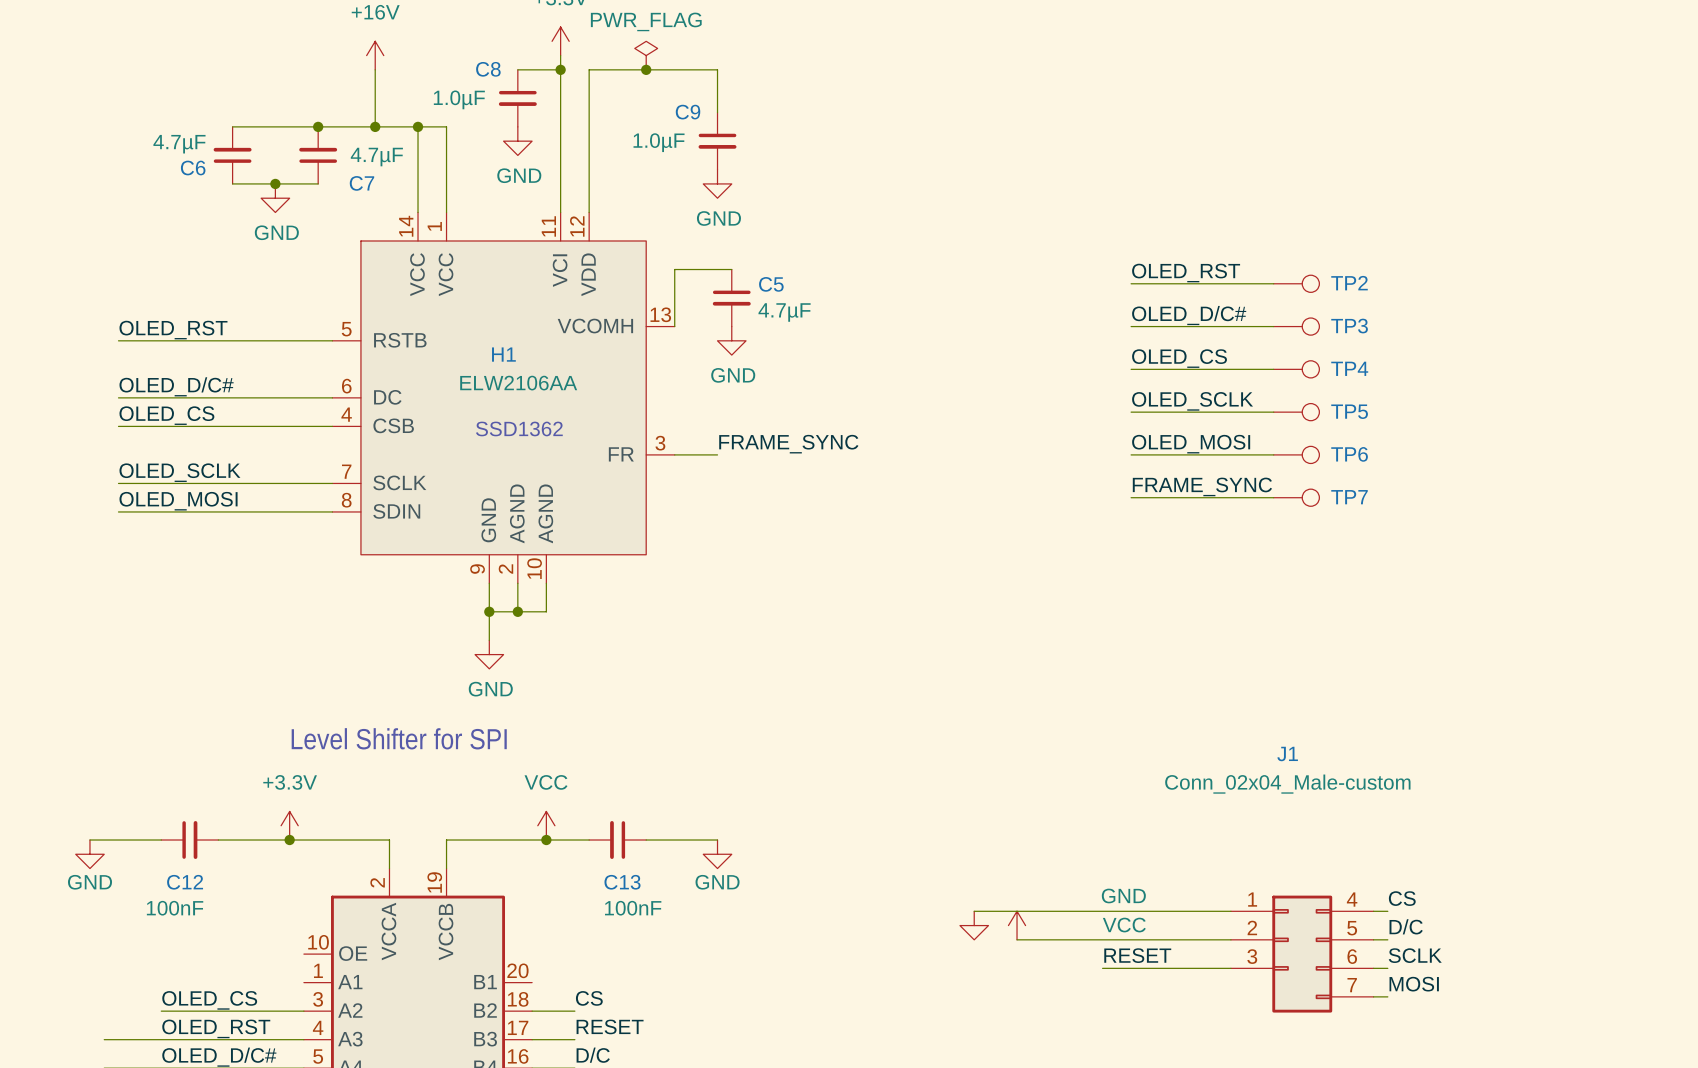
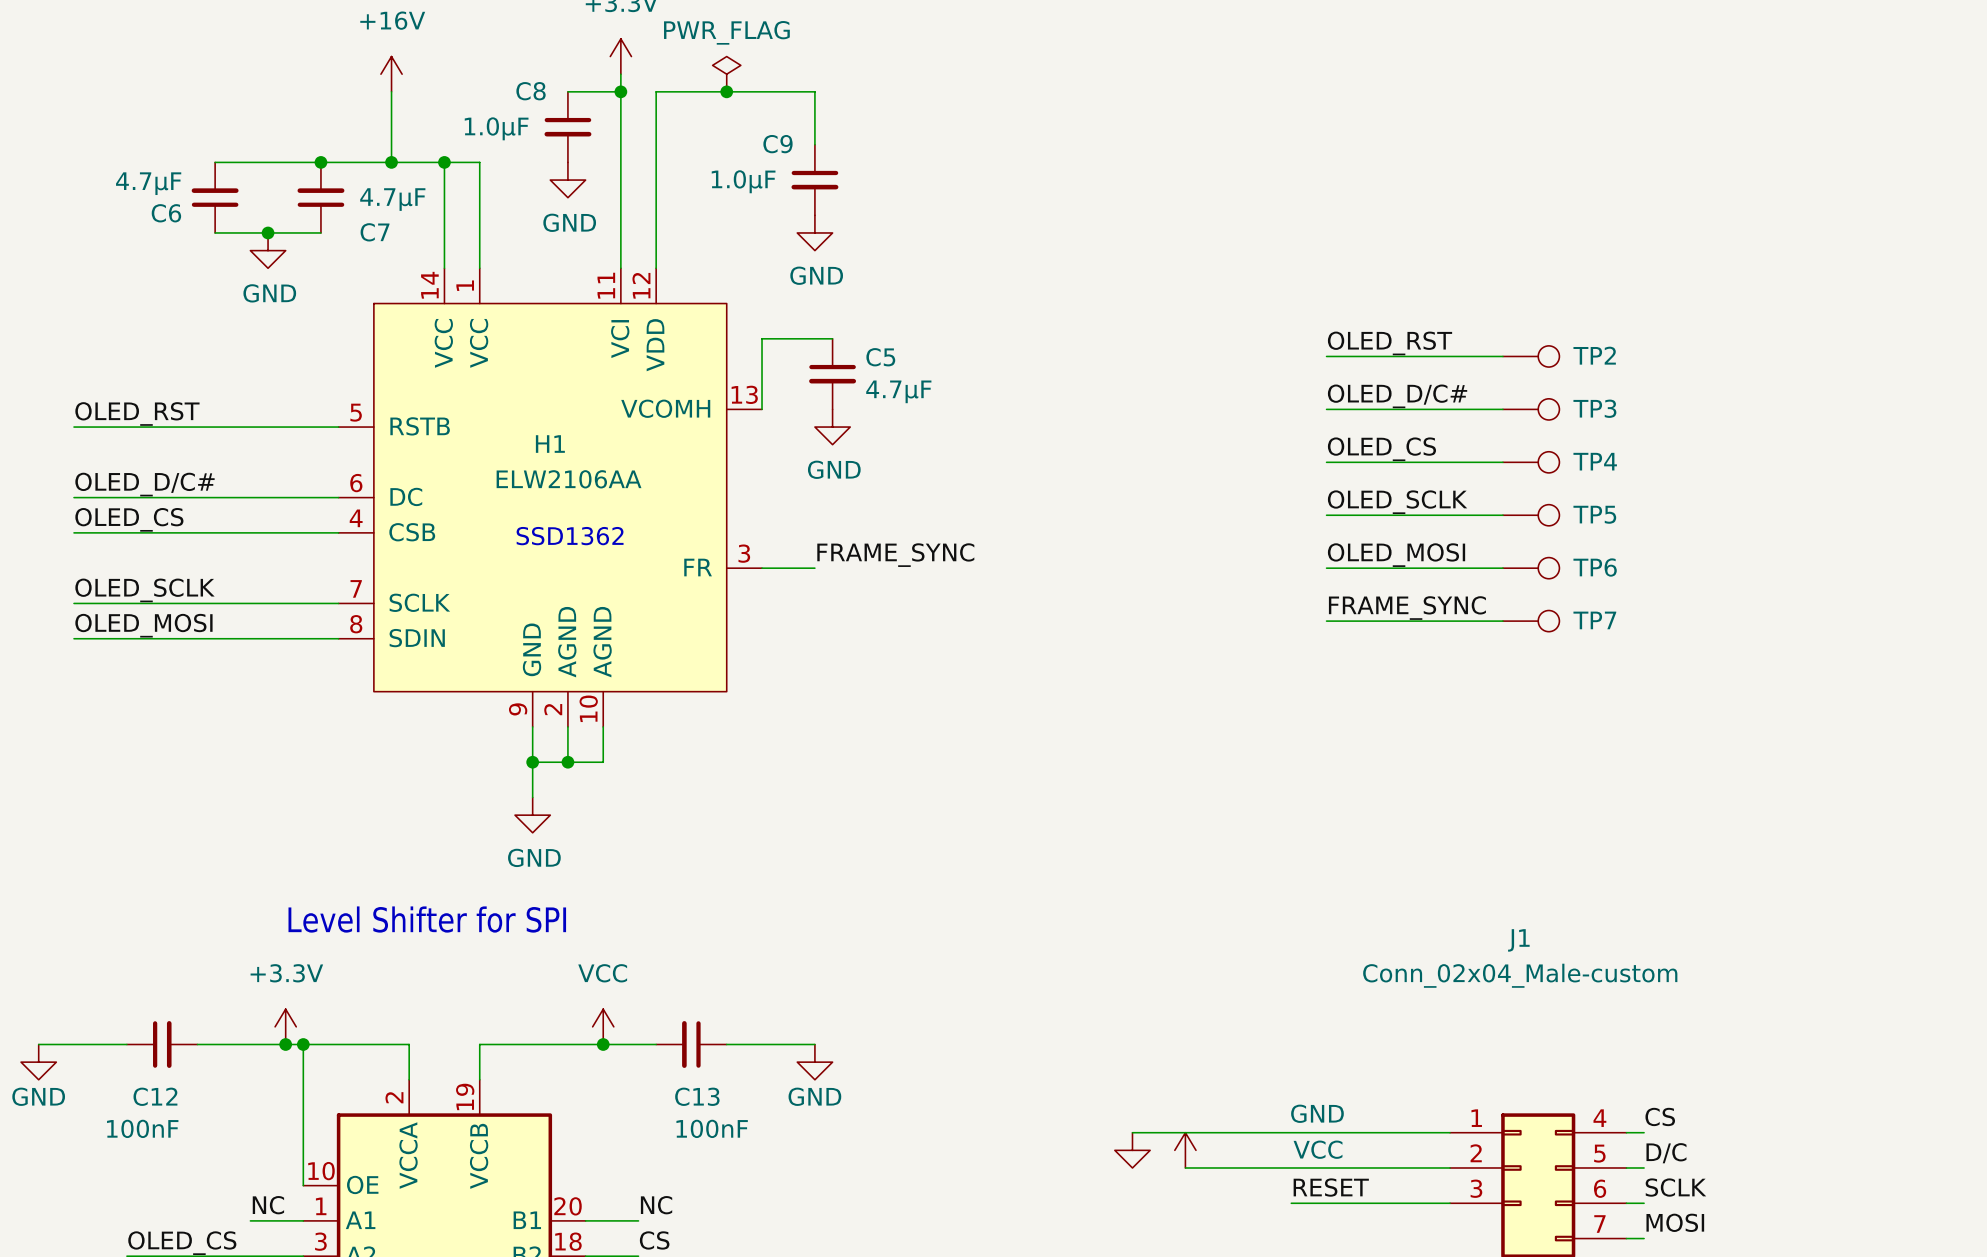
wire: none -> (303, 1044) (303, 1185)
junction: none -> (303, 1044)
label: none -> NC (268, 1205)
label: none -> NC (656, 1205)
wire: none -> (250, 1220) (303, 1220)
wire: none -> (585, 1220) (638, 1220)

